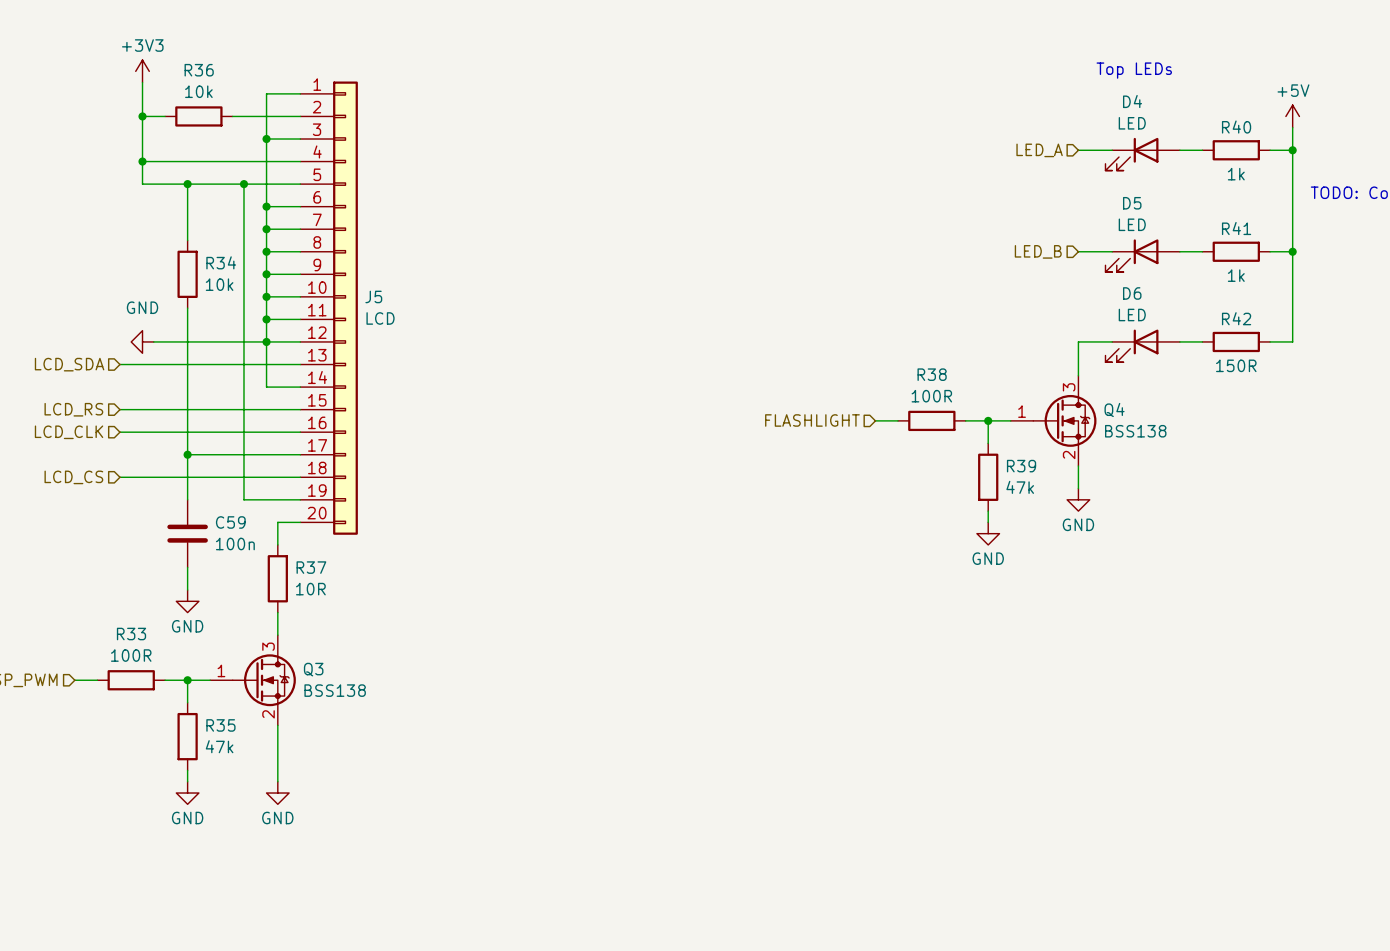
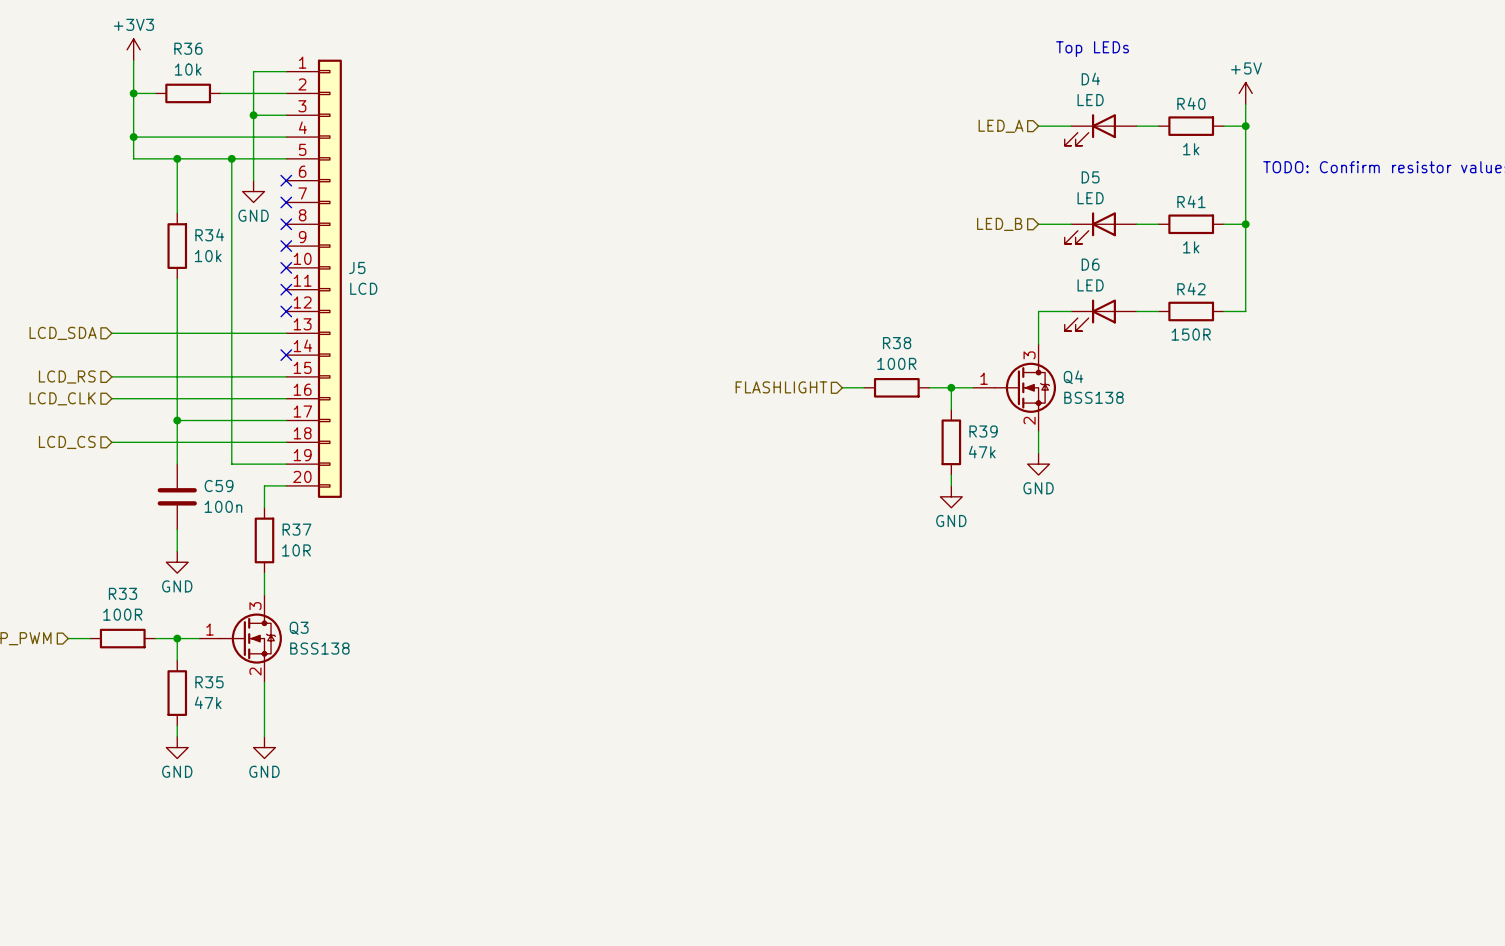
junction: (266, 206) -> none
wire: (300, 206) (266, 206) (266, 387) (300, 387) -> none
no-connect mark: none -> (286, 180)
wire: (266, 229) (300, 229) -> none
junction: (266, 229) -> none
no-connect mark: none -> (286, 202)
wire: (266, 251) (300, 251) -> none
junction: (266, 251) -> none
no-connect mark: none -> (286, 224)
wire: (266, 274) (300, 274) -> none
junction: (266, 274) -> none
no-connect mark: none -> (286, 246)
wire: (266, 296) (300, 296) -> none
junction: (266, 296) -> none
no-connect mark: none -> (286, 267)
power symbol text position: GND (142, 307) -> GND (253, 215)
wire: (266, 319) (300, 319) -> none
junction: (266, 319) -> none
no-connect mark: none -> (286, 289)
power symbol rotation: 0° (142, 341) -> 90° counterclockwise (253, 191)
power symbol position: GND (142, 341) -> GND (253, 191)
wire: (153, 341) (300, 341) -> none
junction: (266, 341) -> none
no-connect mark: none -> (286, 311)
no-connect mark: none -> (286, 355)

